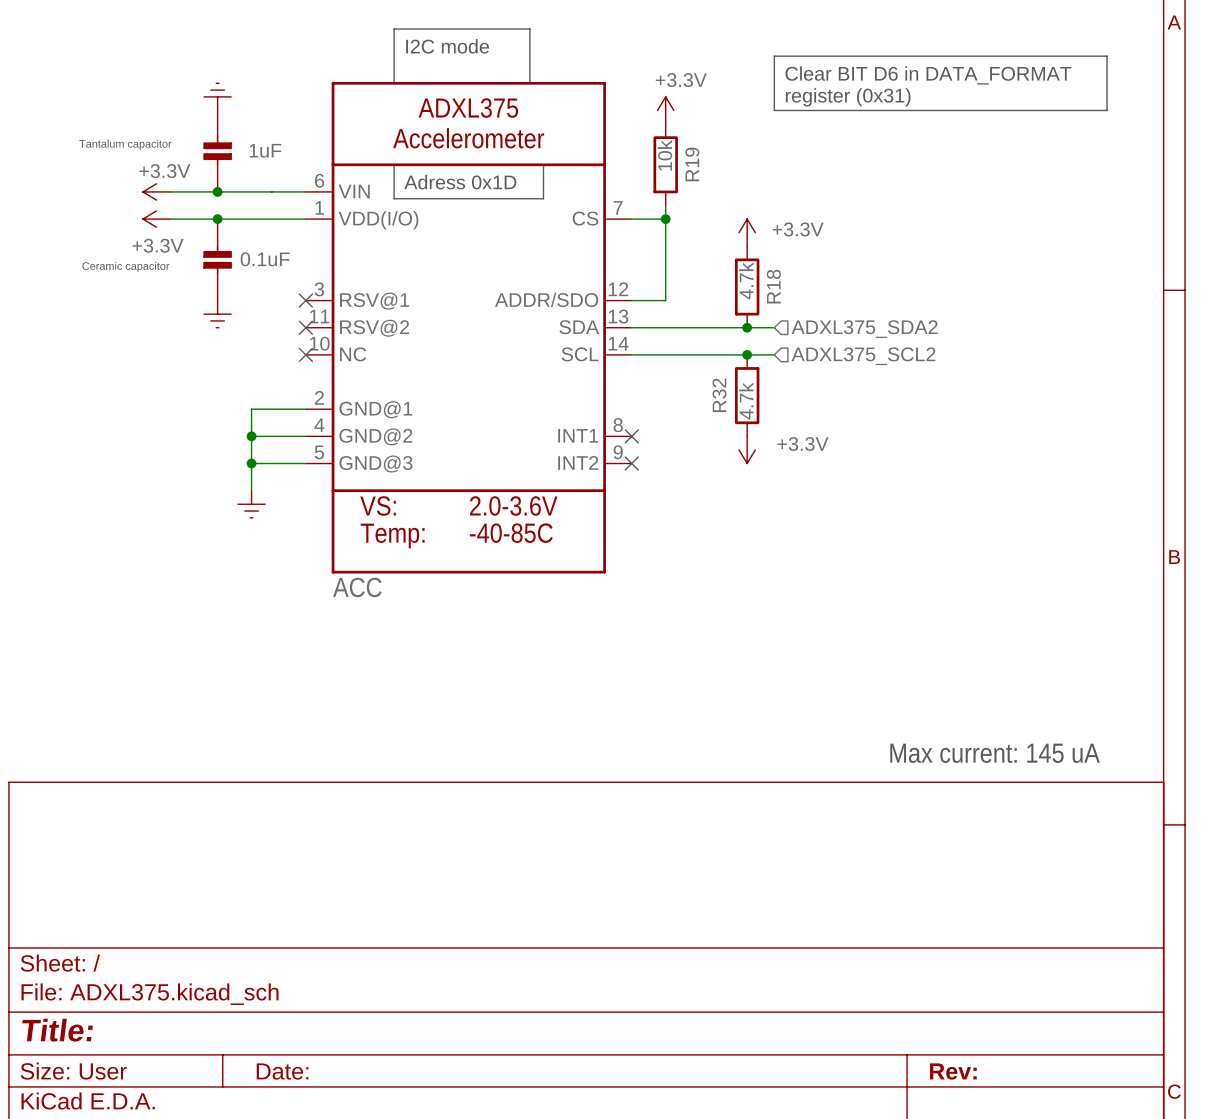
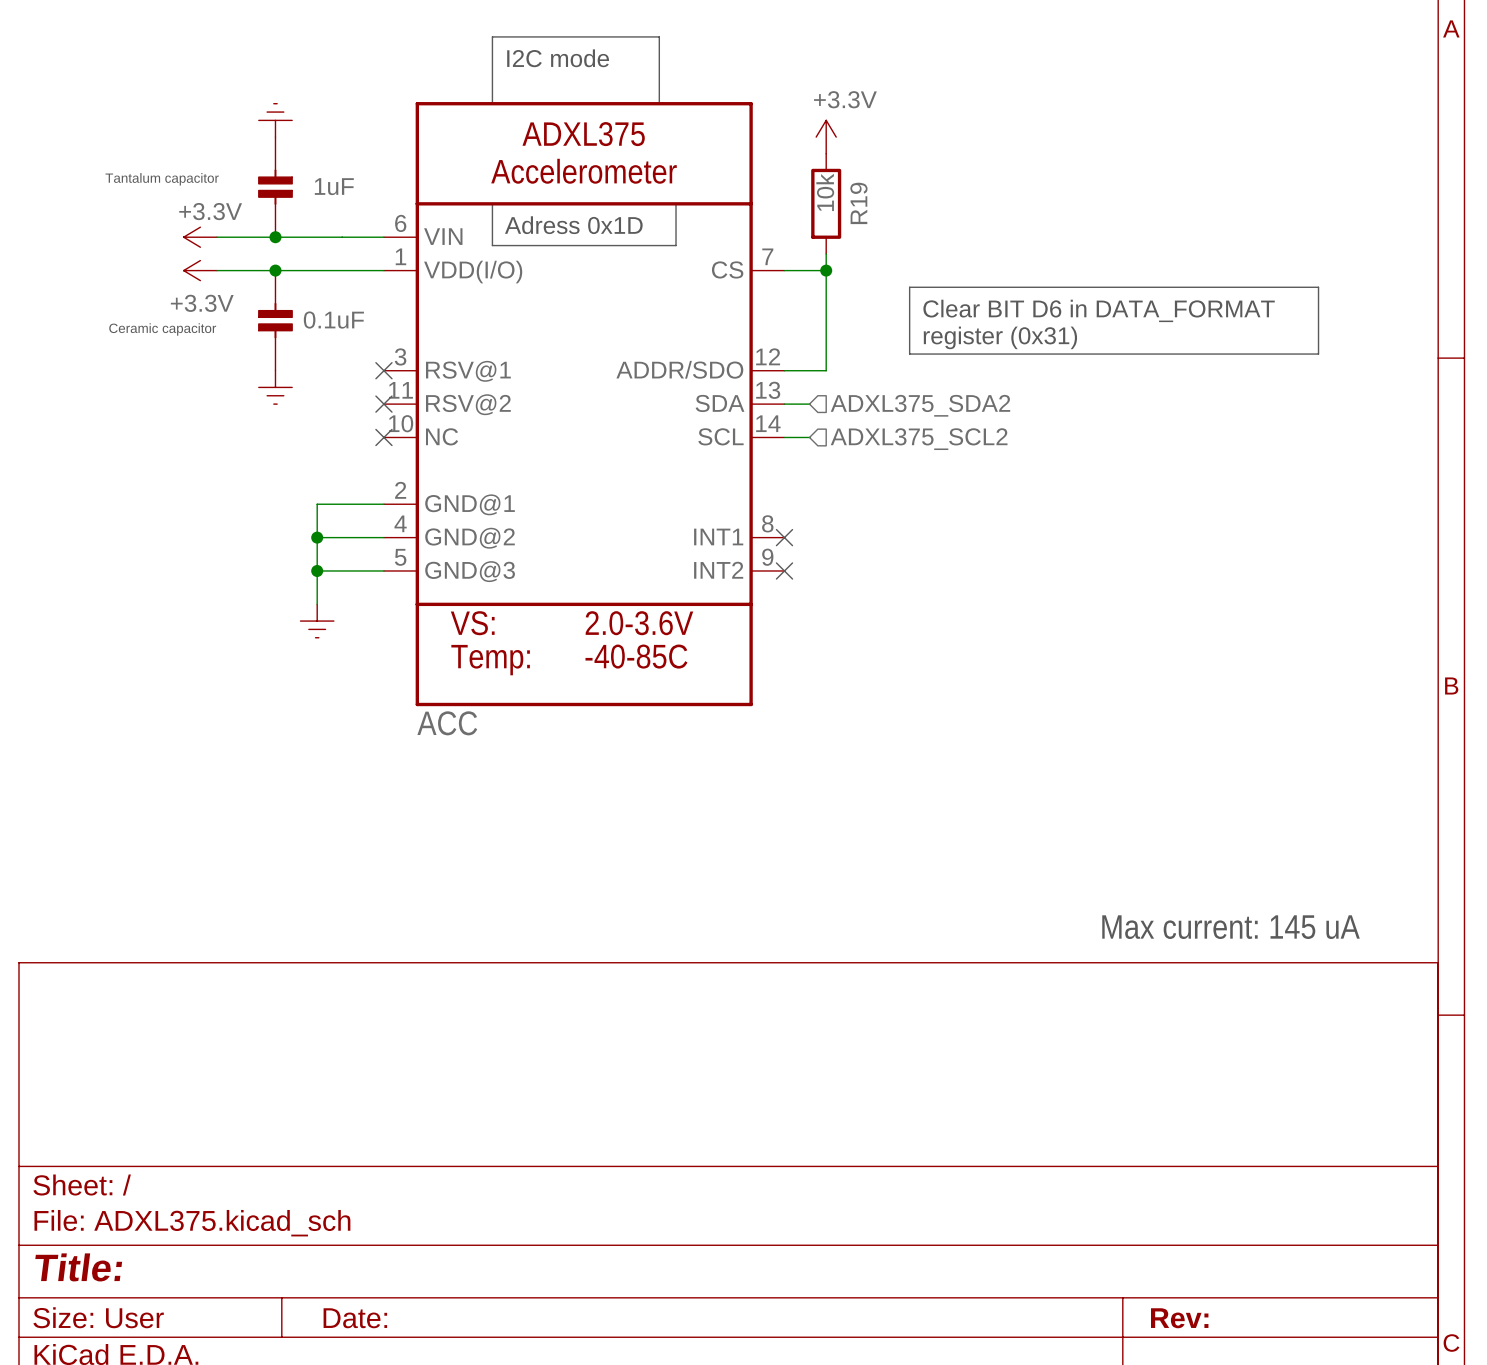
line: (774, 56) (1107, 56) (1107, 110) (774, 110) (774, 56) -> (909, 287) (1318, 287) (1318, 354) (909, 354) (909, 287)
text position: Clear BIT D6 in DATA_FORMAT (928, 75) -> Clear BIT D6 in DATA_FORMAT (1099, 310)
text position: register (0x31) (848, 97) -> register (0x31) (1000, 337)
power symbol: +3.3V (747, 232) -> none
R18: 4.7k (747, 287) -> none
wire: (652, 327) (774, 327) -> none
junction: (747, 327) -> none
hierarchical label position: ADXL375_SDA2 (864, 329) -> ADXL375_SDA2 (920, 405)
wire: (652, 354) (774, 354) -> none
junction: (747, 354) -> none
hierarchical label position: ADXL375_SCL2 (863, 356) -> ADXL375_SCL2 (919, 439)
R32: 4.7k (747, 395) -> none
power symbol: +3.3V (747, 449) -> none

